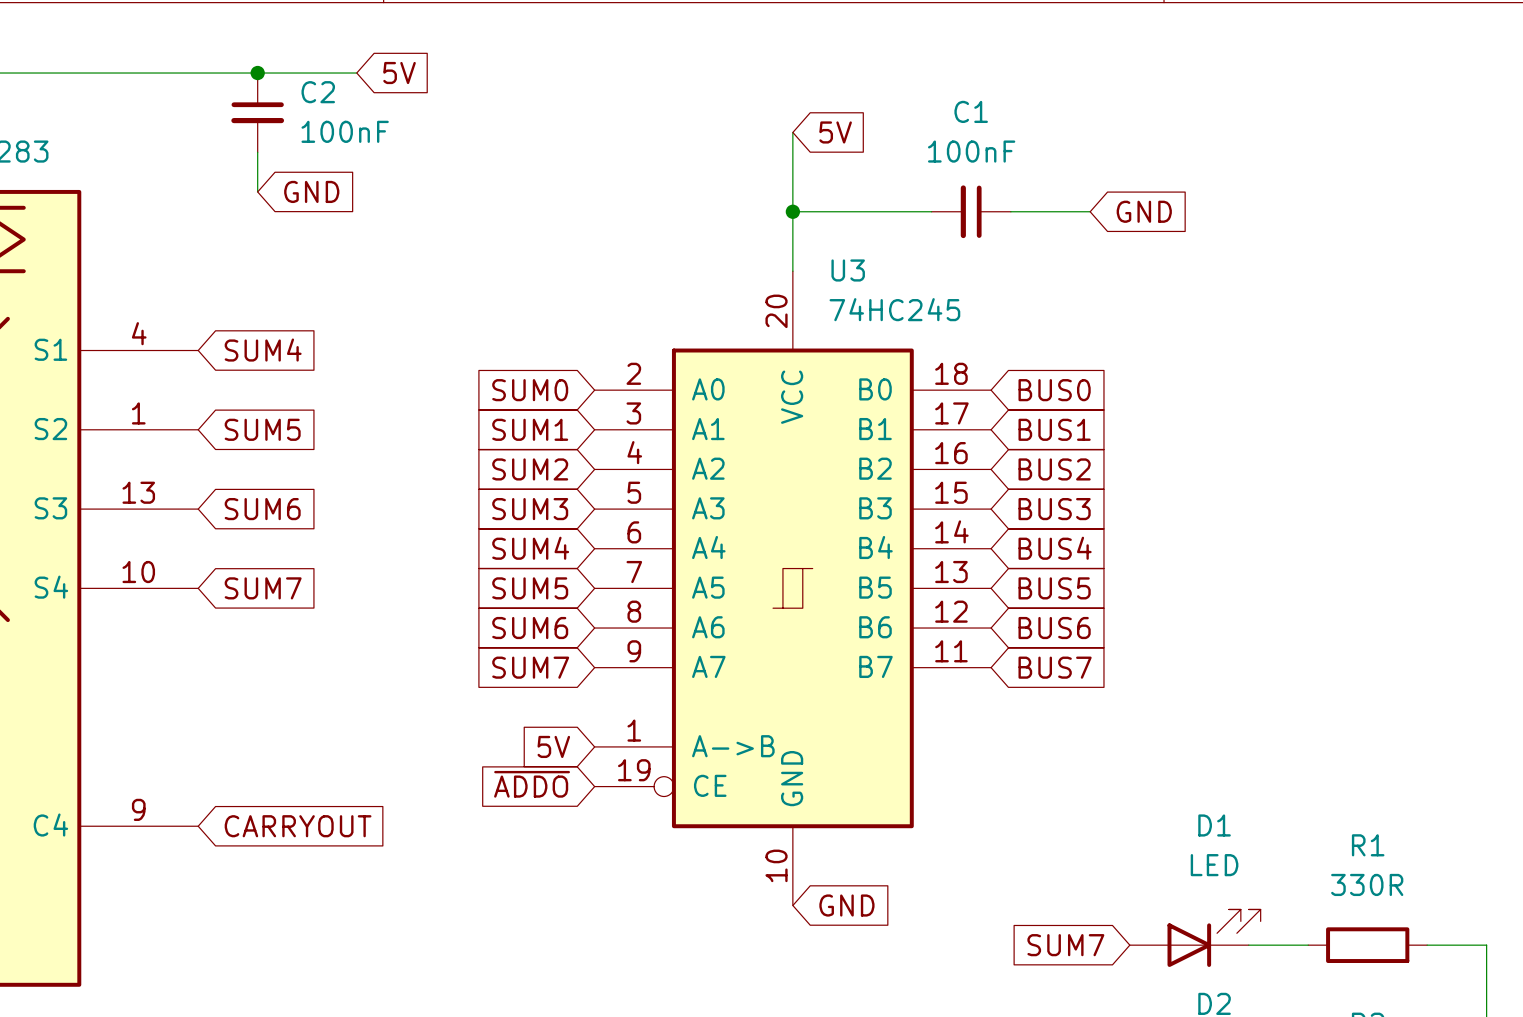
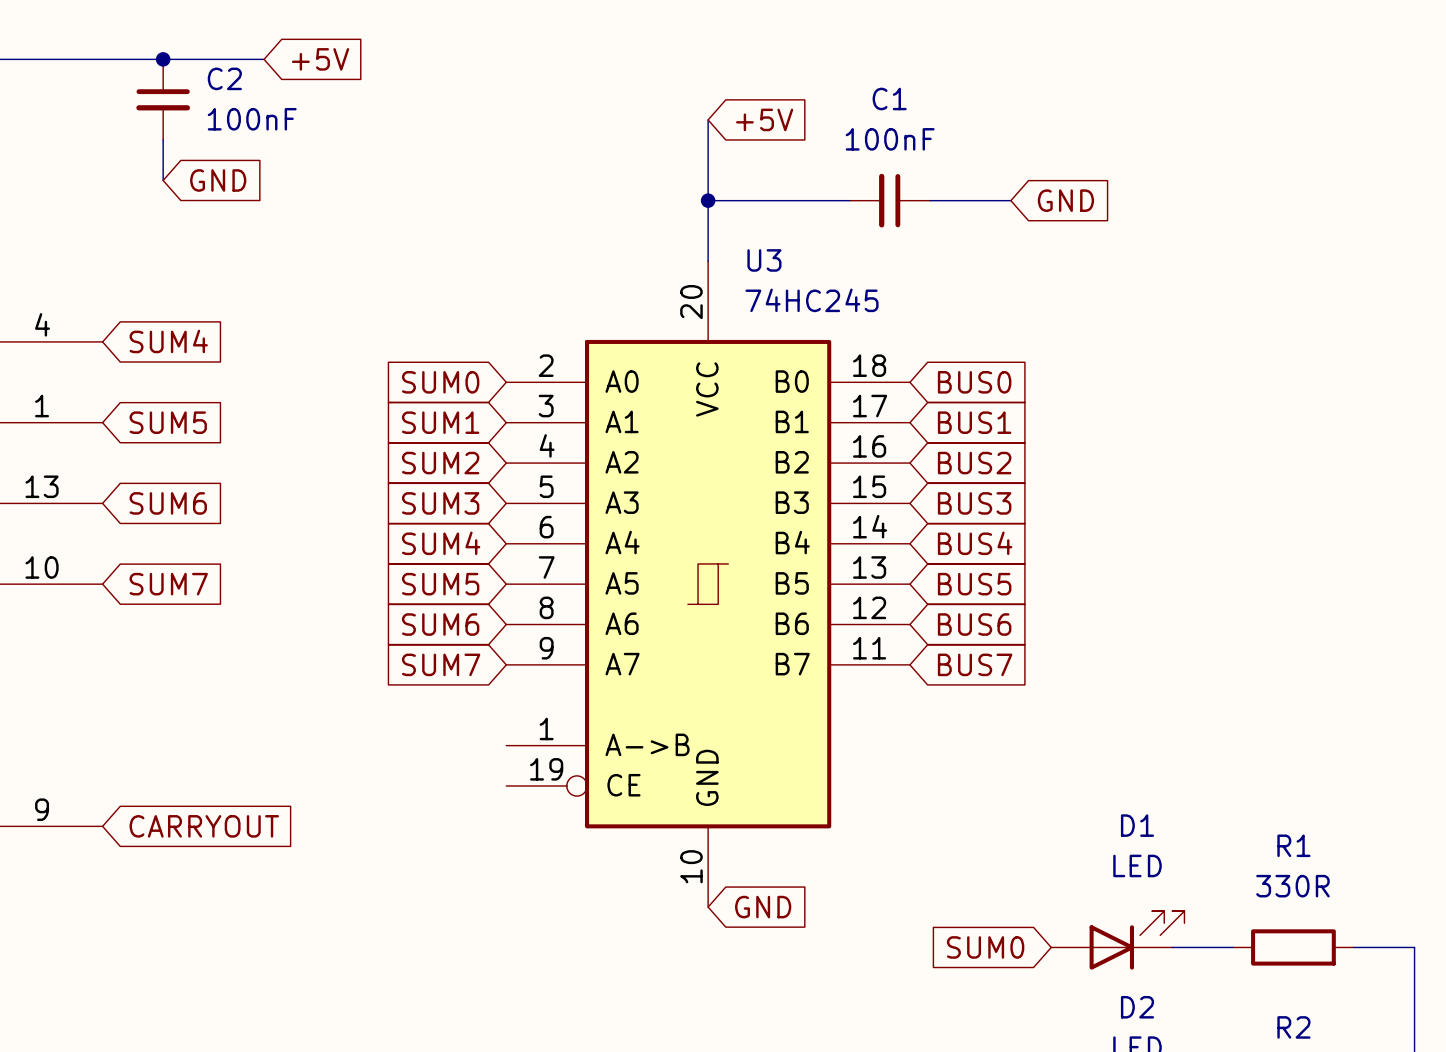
global label: 5V (399, 73) -> +5V (320, 59)
global label: 5V (835, 132) -> +5V (764, 119)
global label: 5V (553, 746) -> none
global label: ~{ADDO} (532, 784) -> none
global label: SUM7 (1065, 945) -> SUM0 (985, 947)

